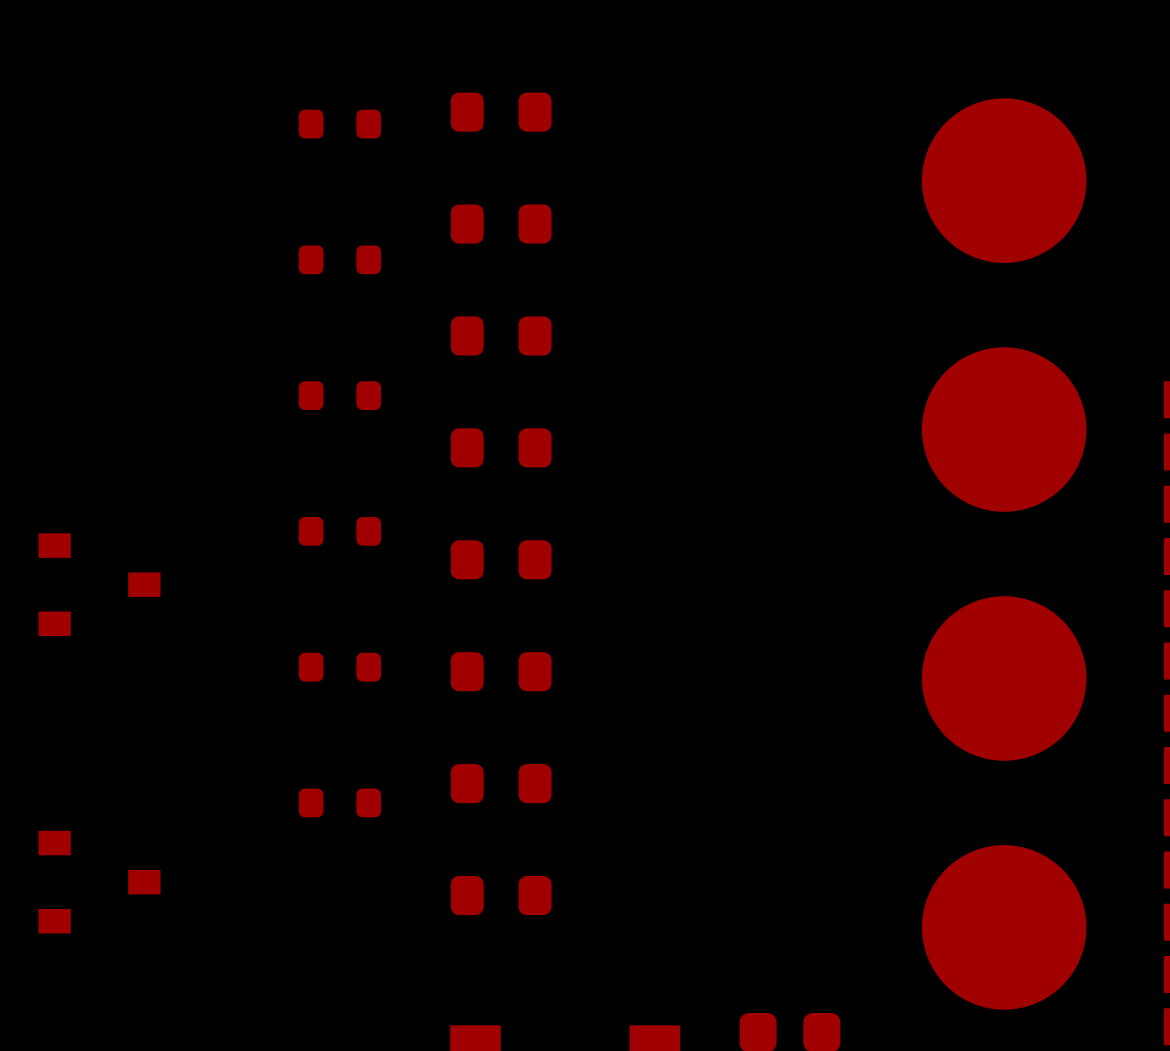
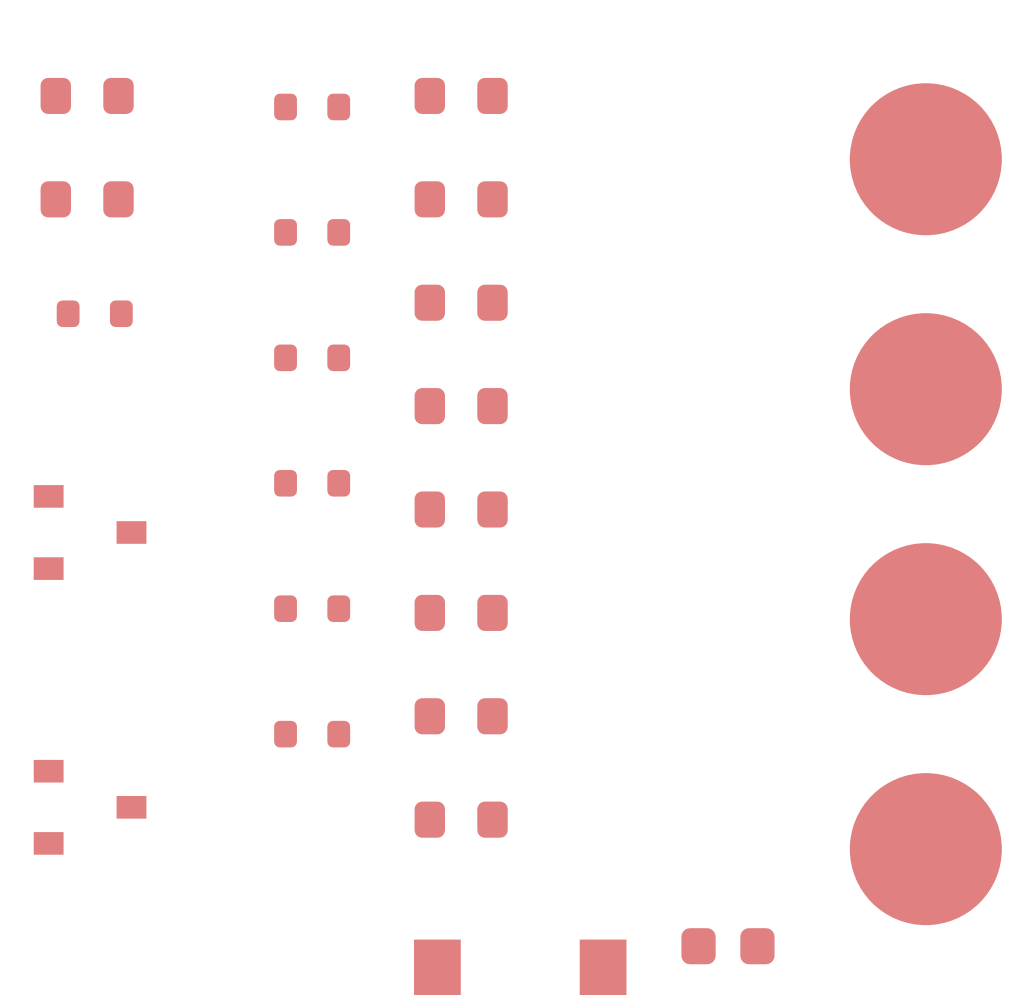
part: none -> (87, 95)
part: none -> (87, 199)
part: none -> (94, 313)

